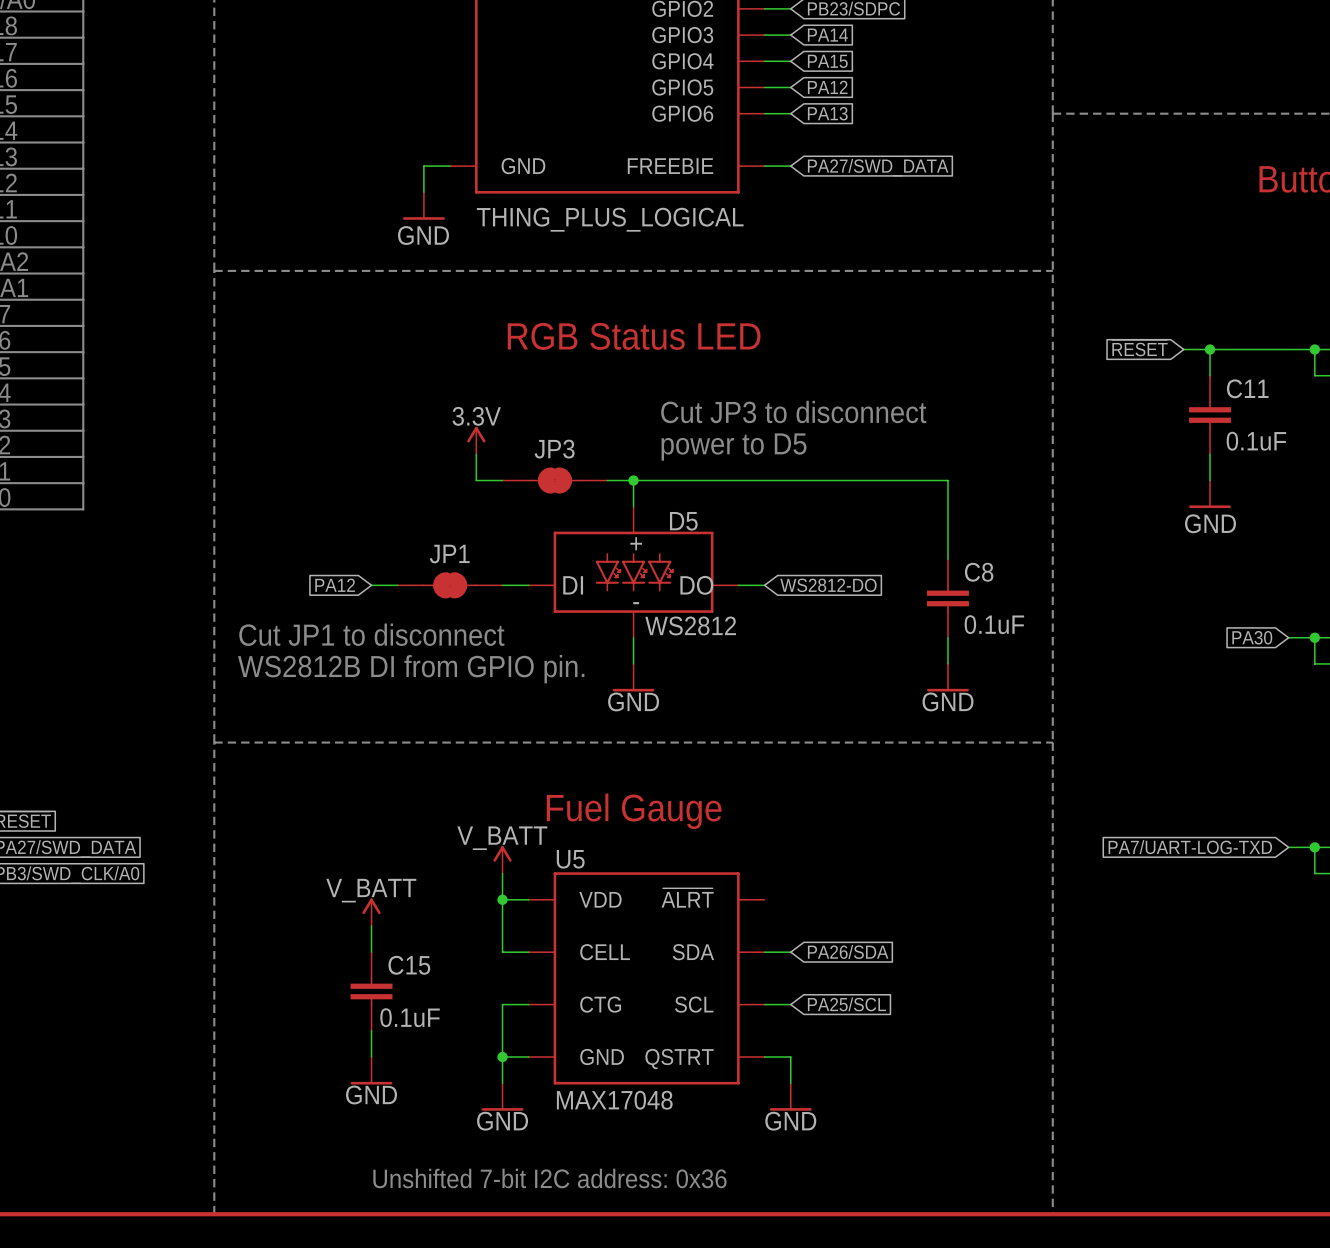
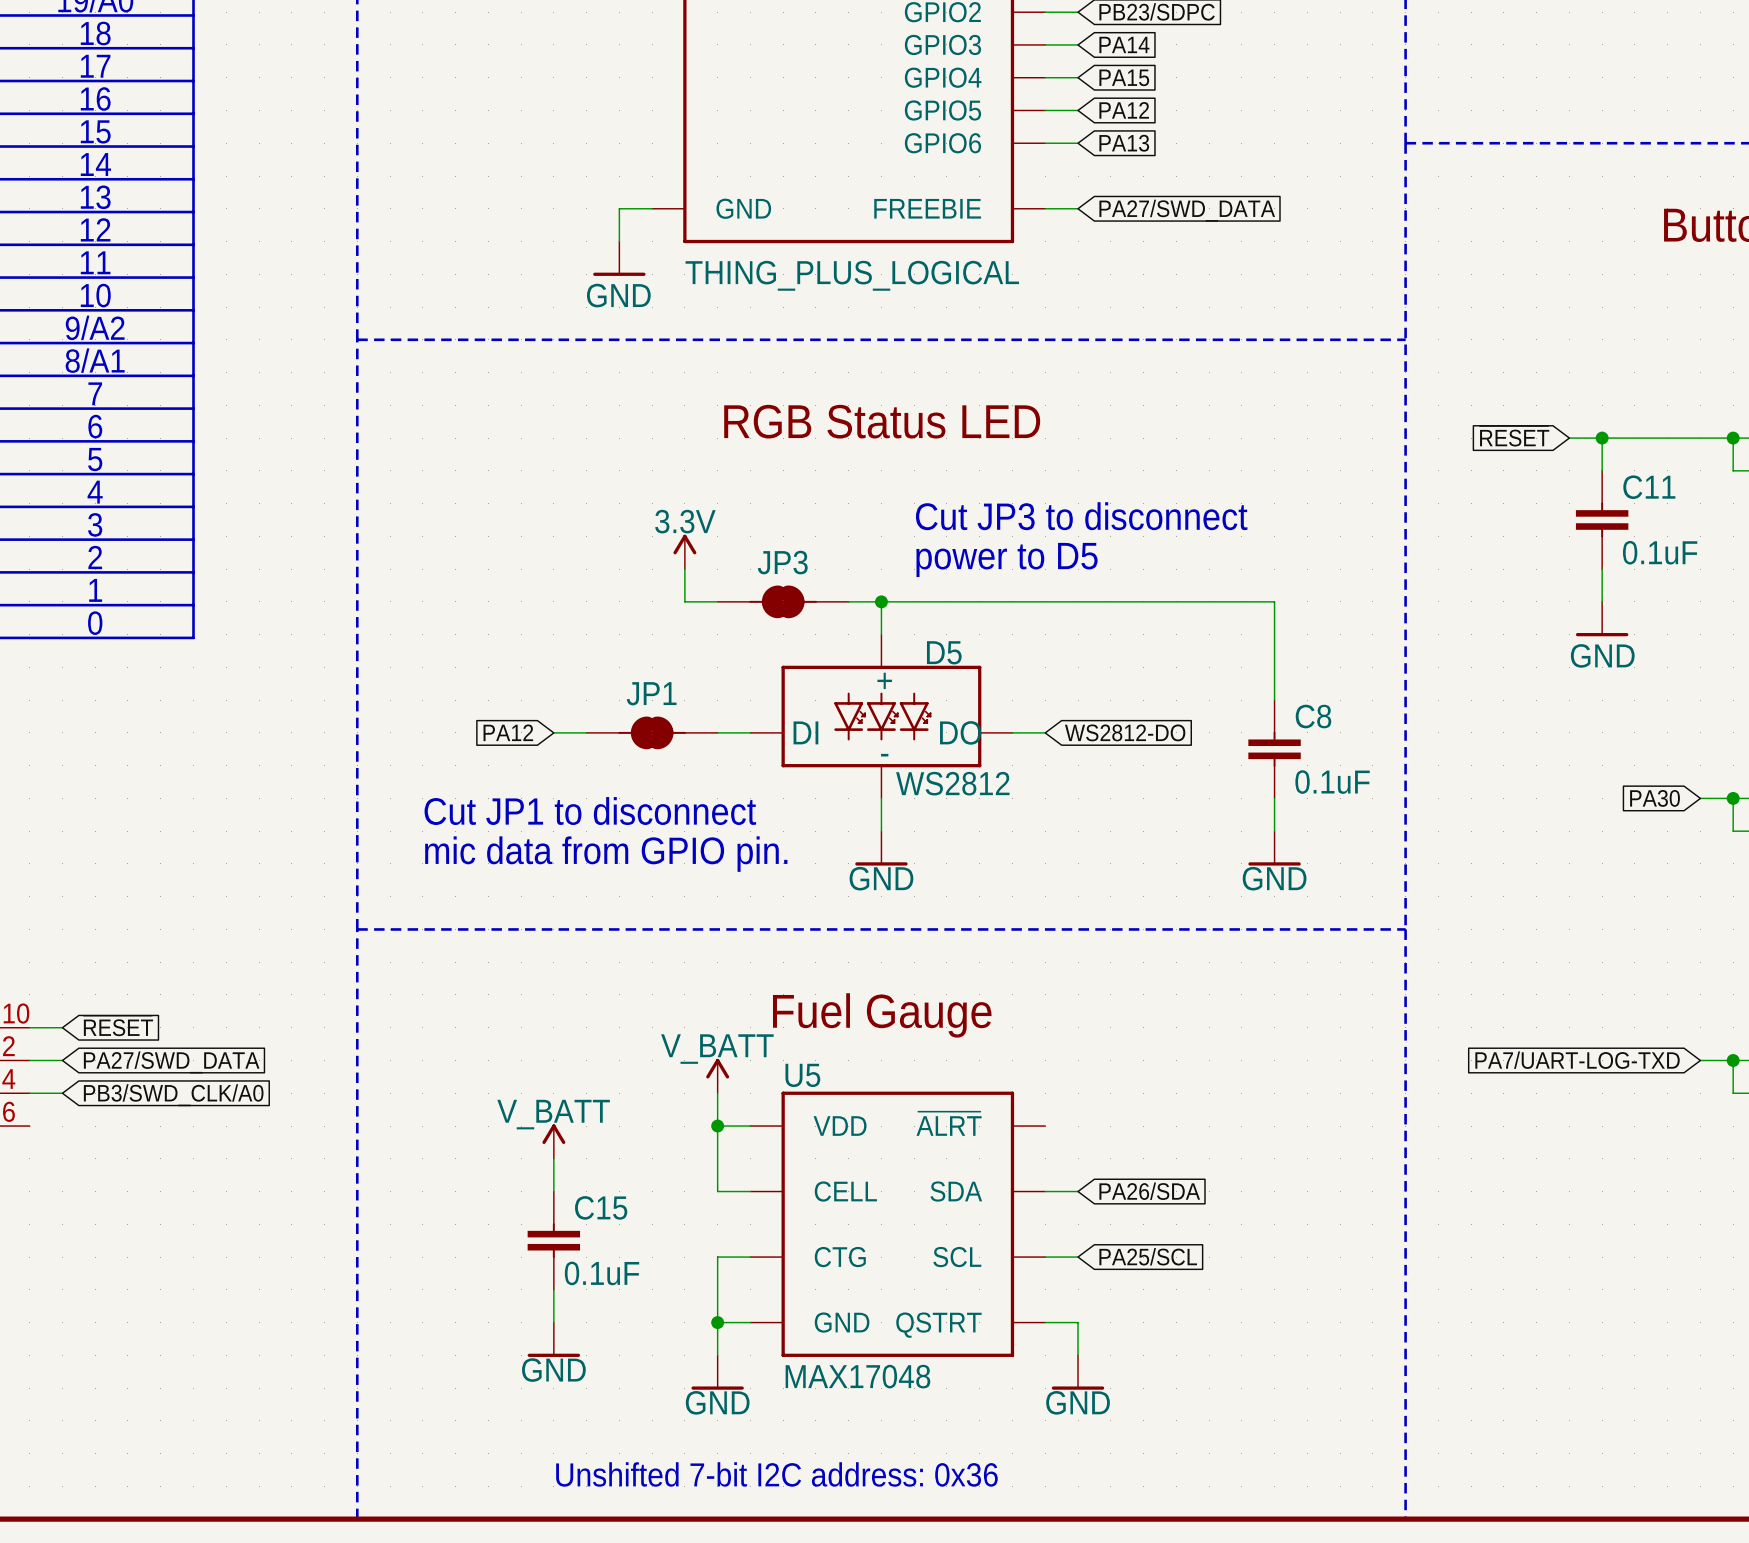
text position: Cut JP1 to disconnect (371, 634) -> Cut JP1 to disconnect (590, 811)
text: WS2812B DI from GPIO pin. (411, 669) -> mic data from GPIO pin. (606, 854)

